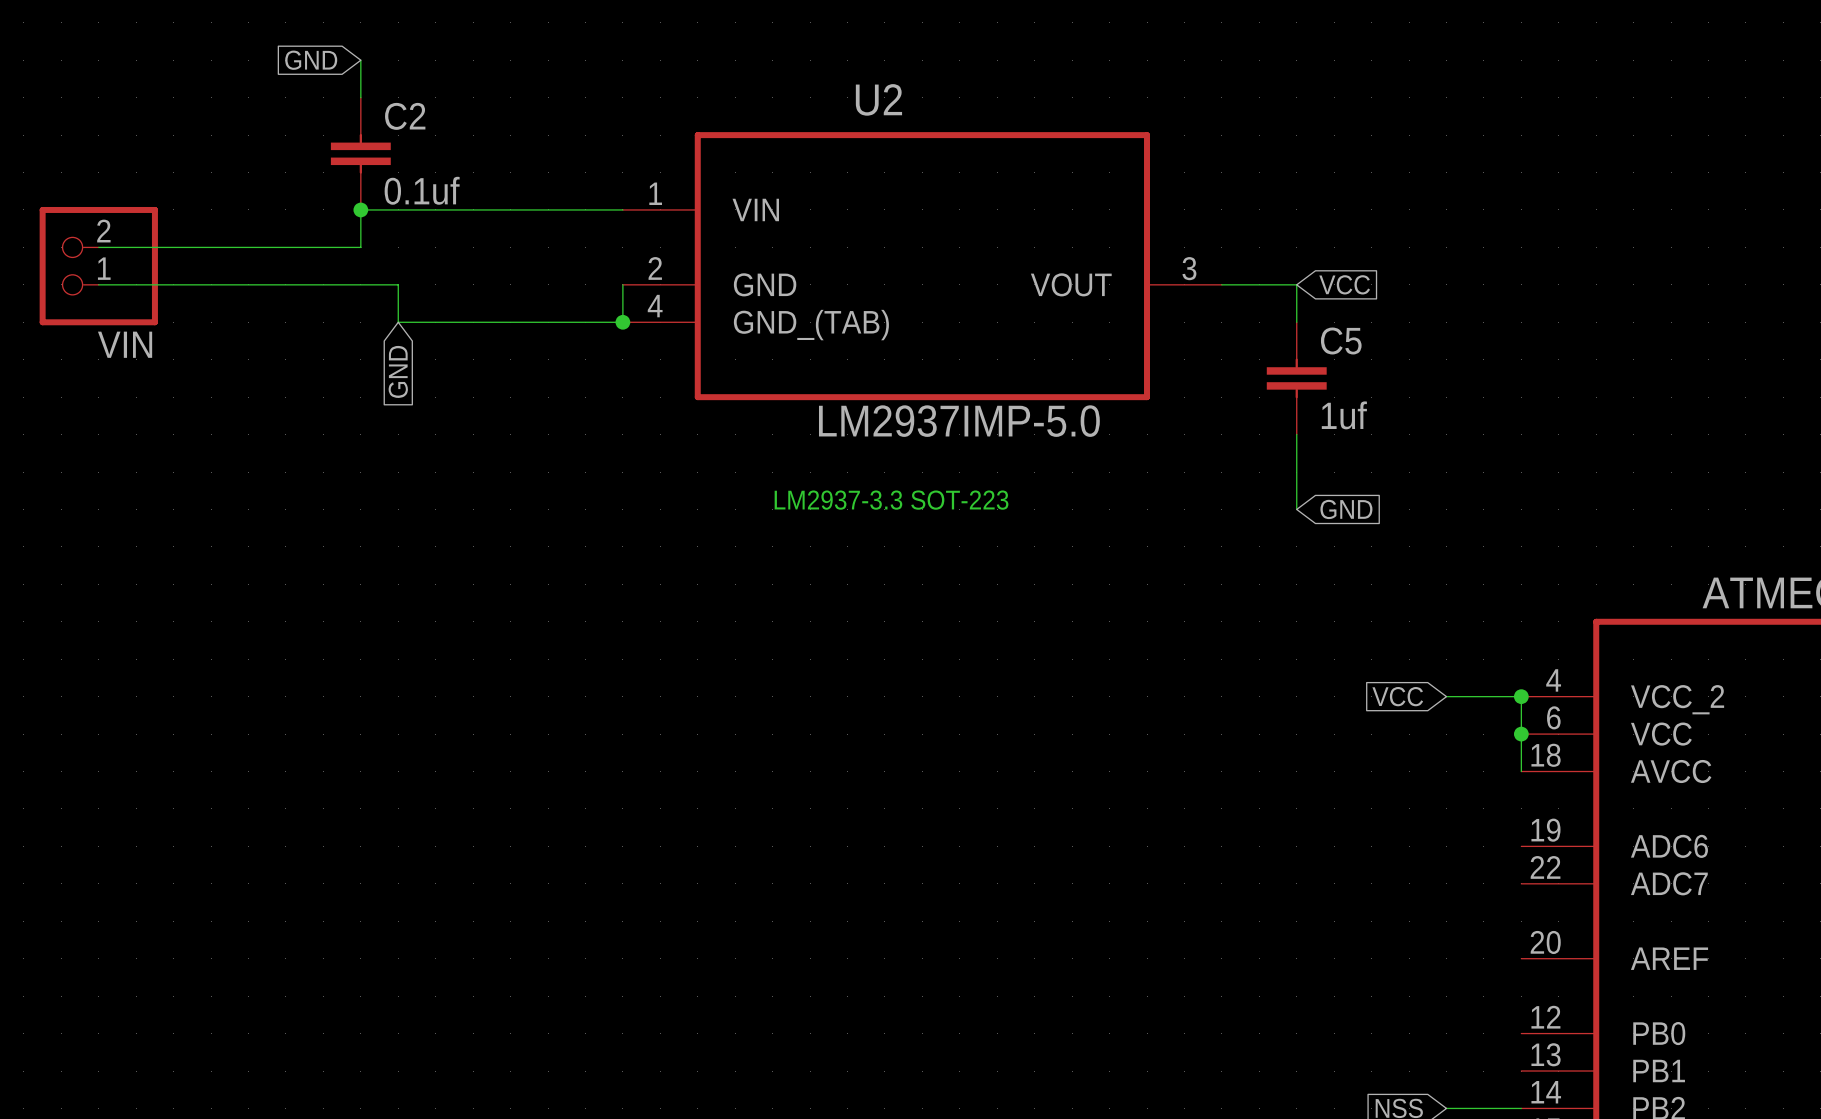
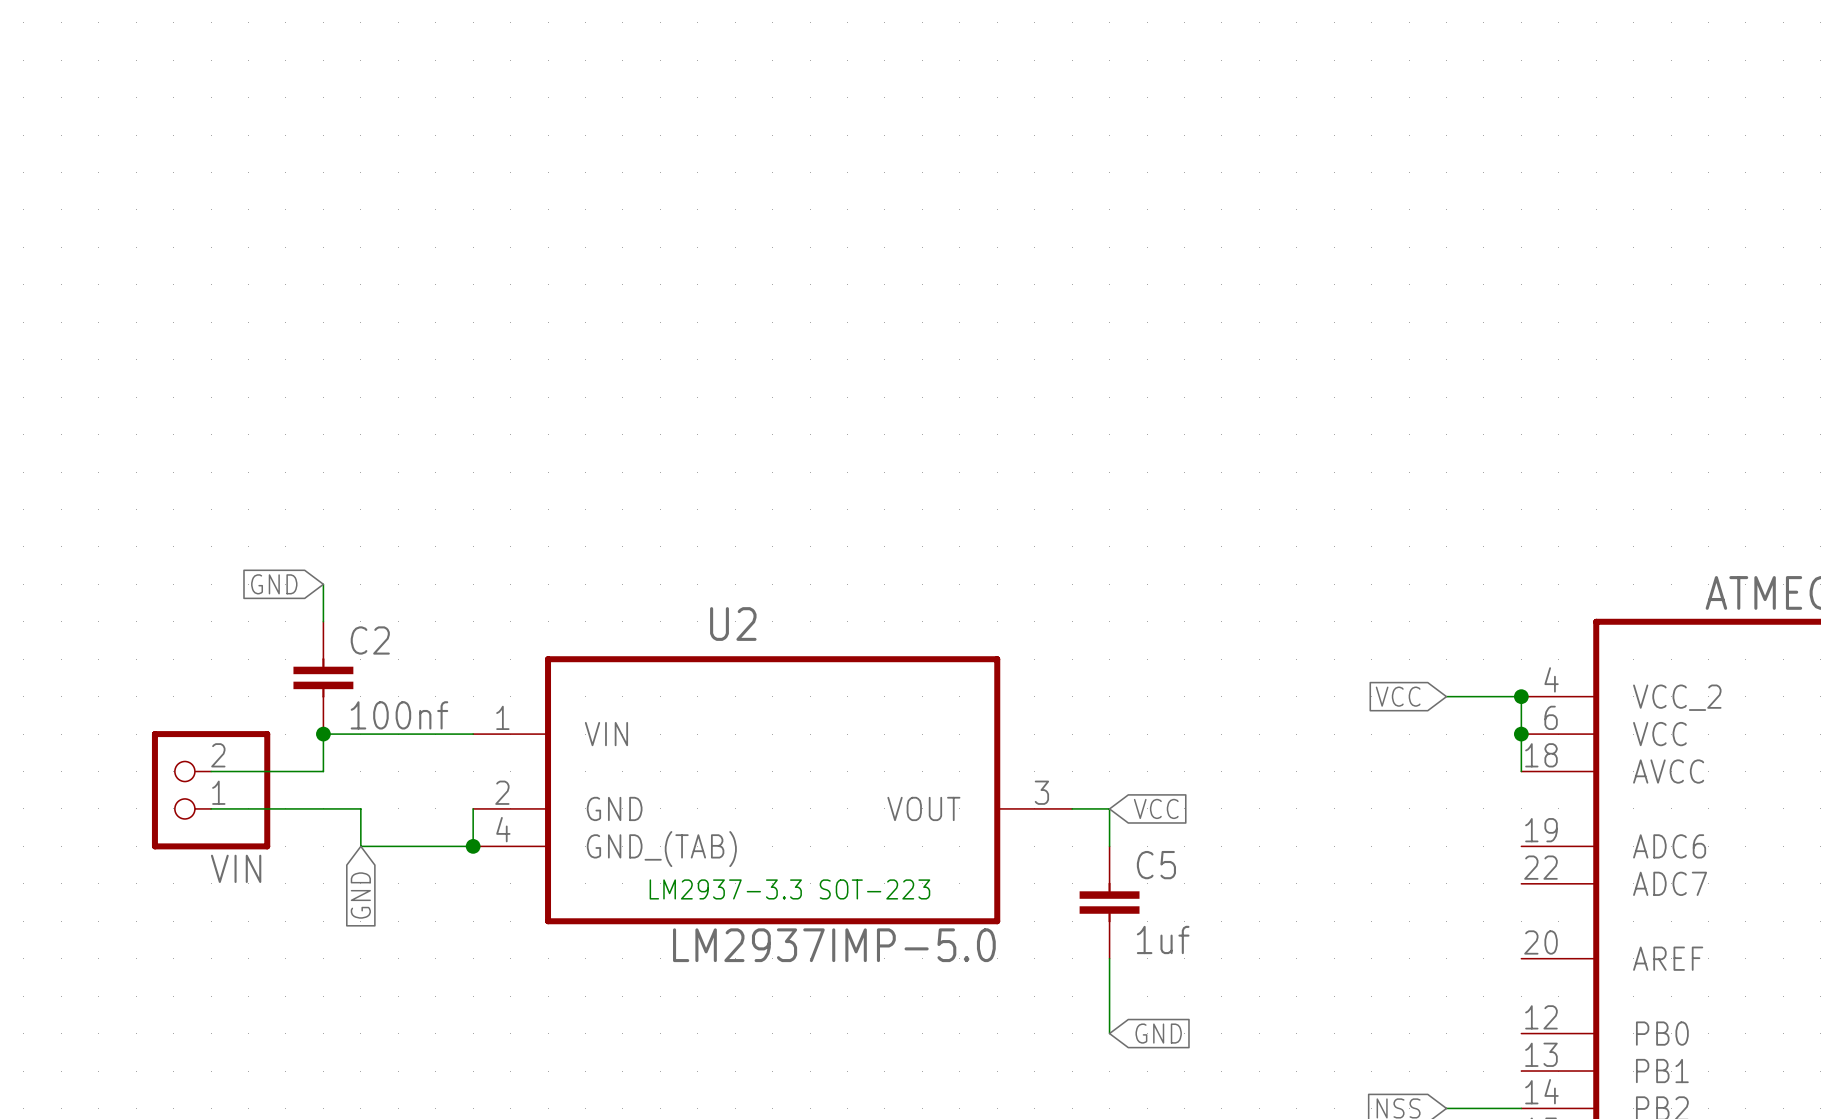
global label: GND (311, 60) -> none
wire: (360, 60) (360, 97) -> none
C2 position: (360, 153) -> (323, 677)
C2 value: 0.1uf (422, 190) -> 100nf (399, 715)
junction: (360, 209) -> none
wire: (622, 209) (360, 209) (360, 247) (98, 247) -> none
VIN: (98, 266) -> none
U2 position: (922, 266) -> (772, 790)
wire: (98, 284) (398, 284) (398, 322) (622, 322) (622, 284) -> none
wire: (1221, 284) (1296, 284) (1296, 322) -> none
global label: VCC (1344, 284) -> none
junction: (622, 322) -> none
global label: GND (398, 371) -> none
C5 position: (1296, 378) -> (1109, 902)
wire: (1296, 434) (1296, 509) -> none
text: LM2937-3.3 SOT-223 (891, 500) -> none
global label: GND (1346, 509) -> none
global label: none -> GND (274, 584)
wire: none -> (323, 584) (323, 621)
junction: none -> (323, 734)
wire: none -> (473, 734) (323, 734) (323, 771) (211, 771)
VIN: none -> (211, 790)
wire: none -> (211, 808) (360, 808) (360, 846) (473, 846) (473, 808)
wire: none -> (1072, 808) (1109, 808) (1109, 846)
global label: none -> VCC (1156, 808)
junction: none -> (473, 846)
text: none -> LM2937-3.3 SOT-223 (789, 889)
global label: none -> GND (360, 895)
wire: none -> (1109, 958) (1109, 1033)
global label: none -> GND (1158, 1033)

